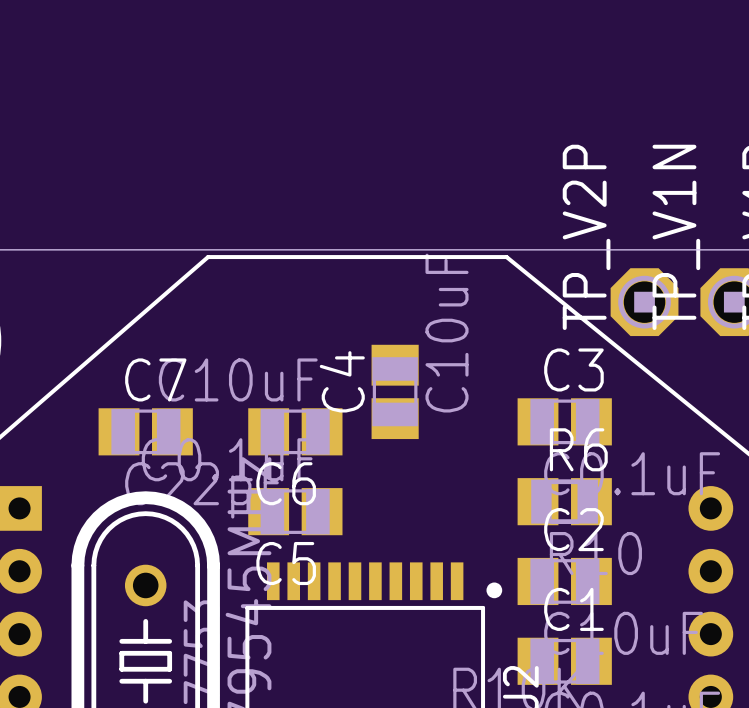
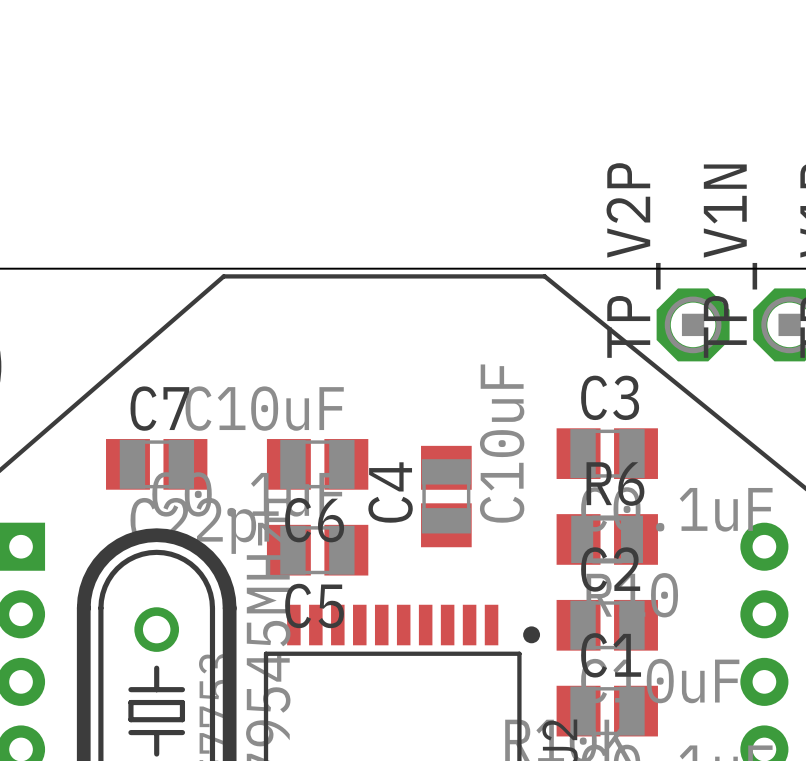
C4 position: (395, 391) -> (446, 496)

